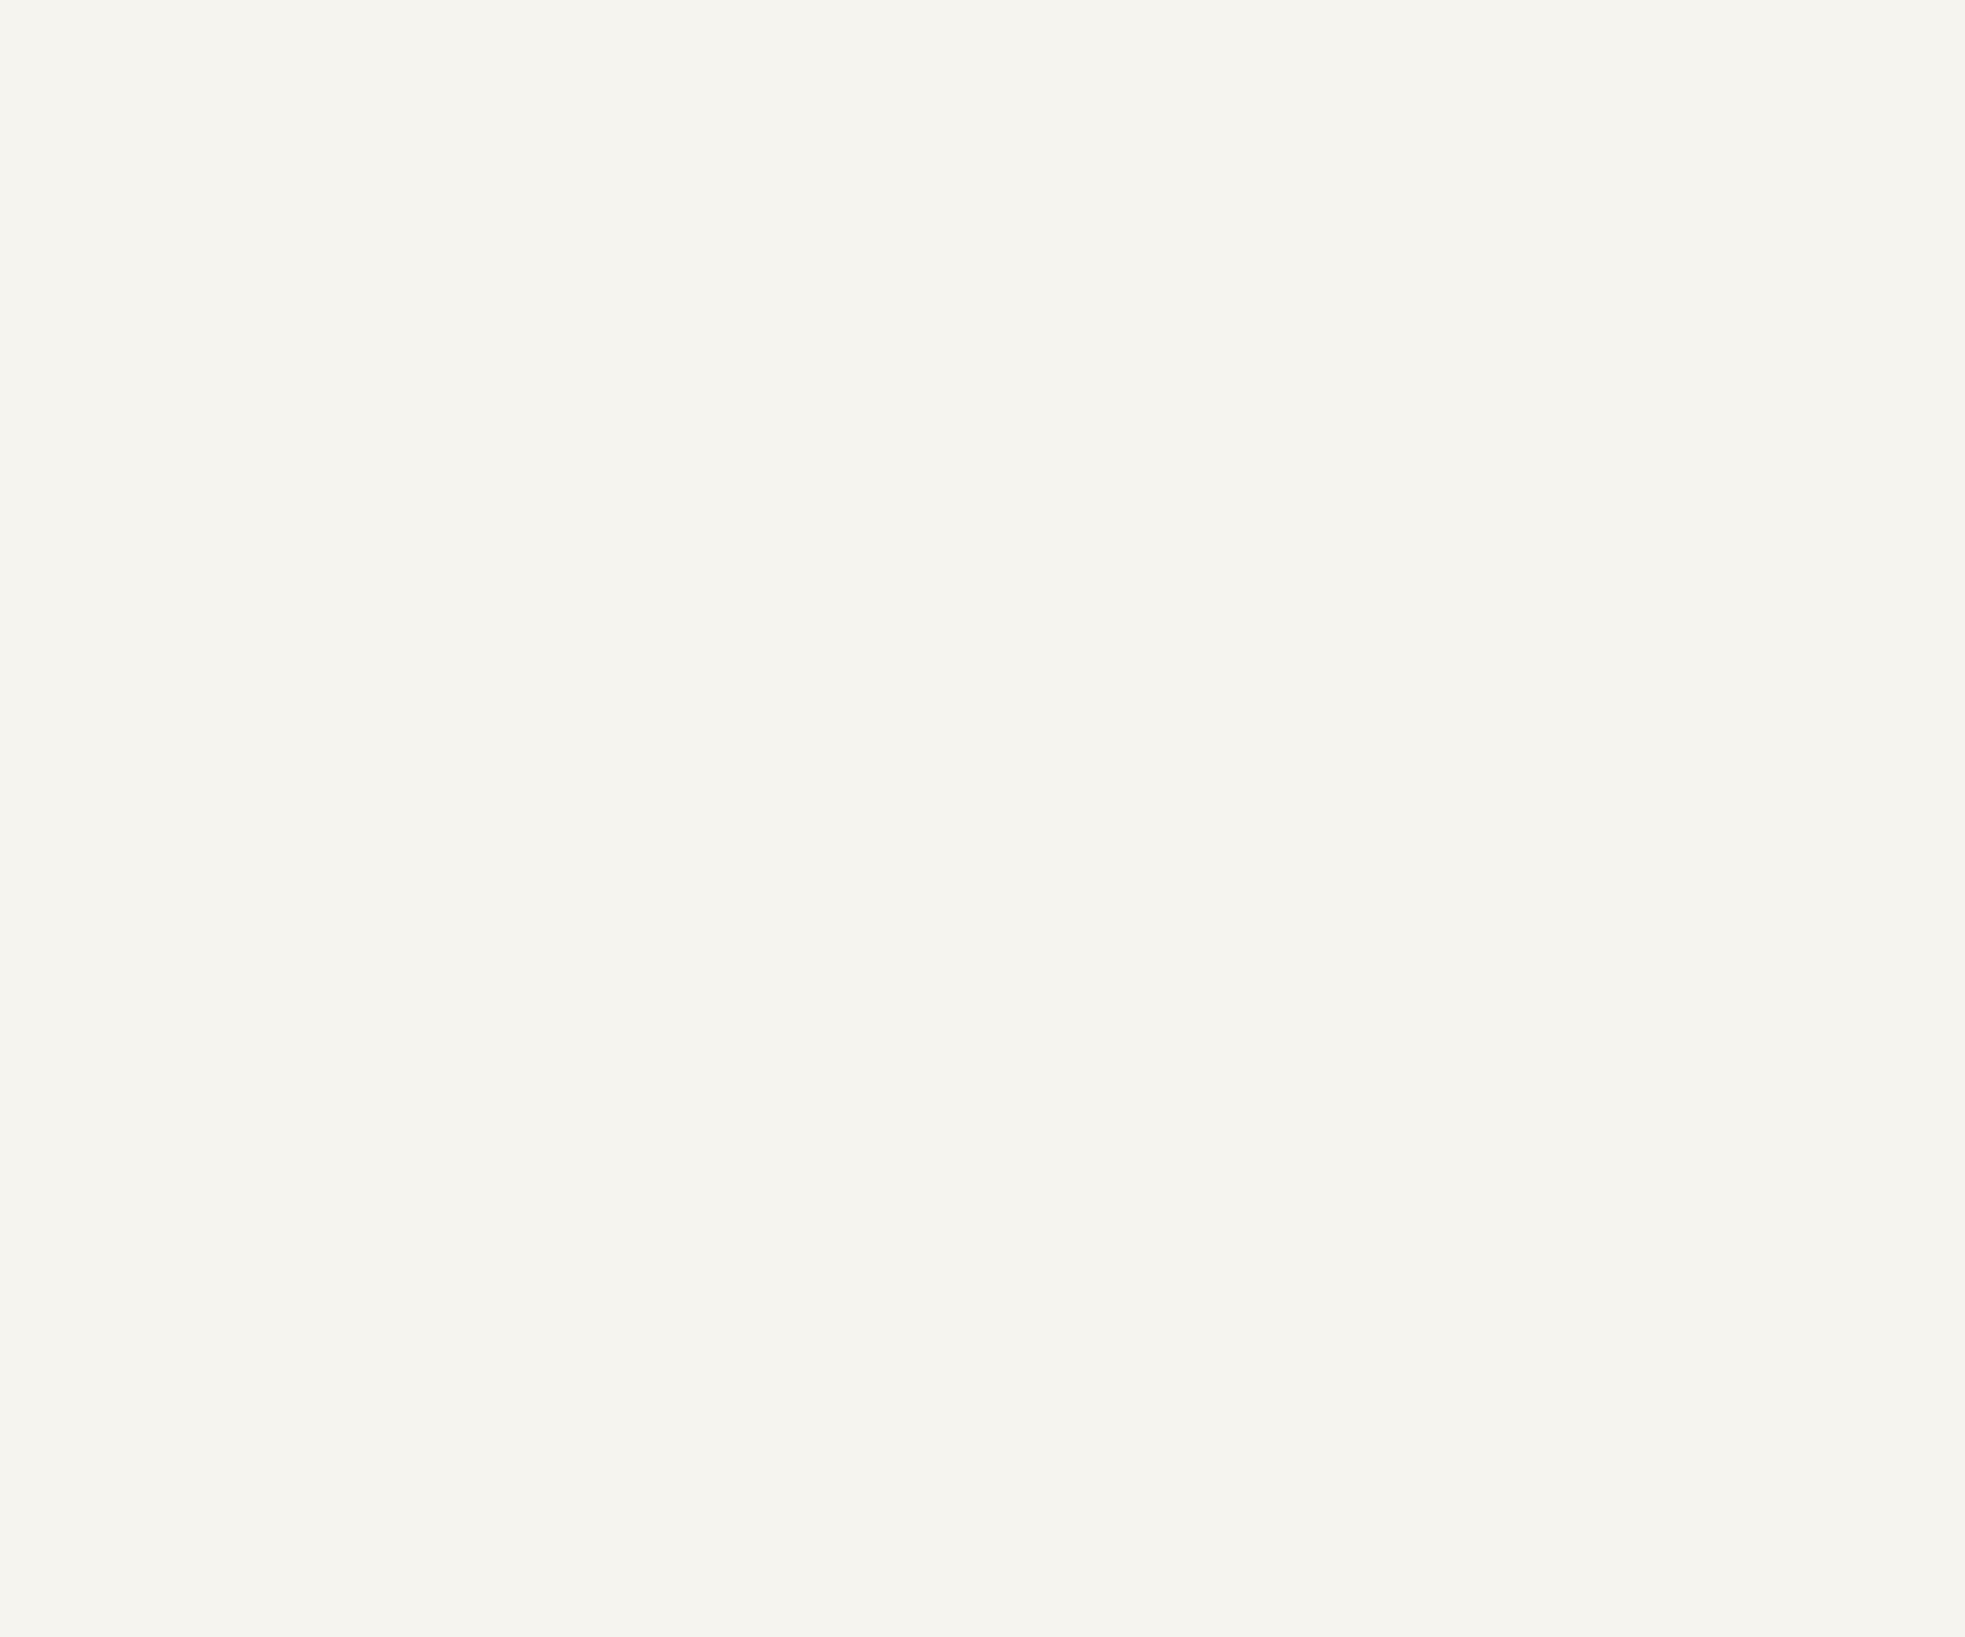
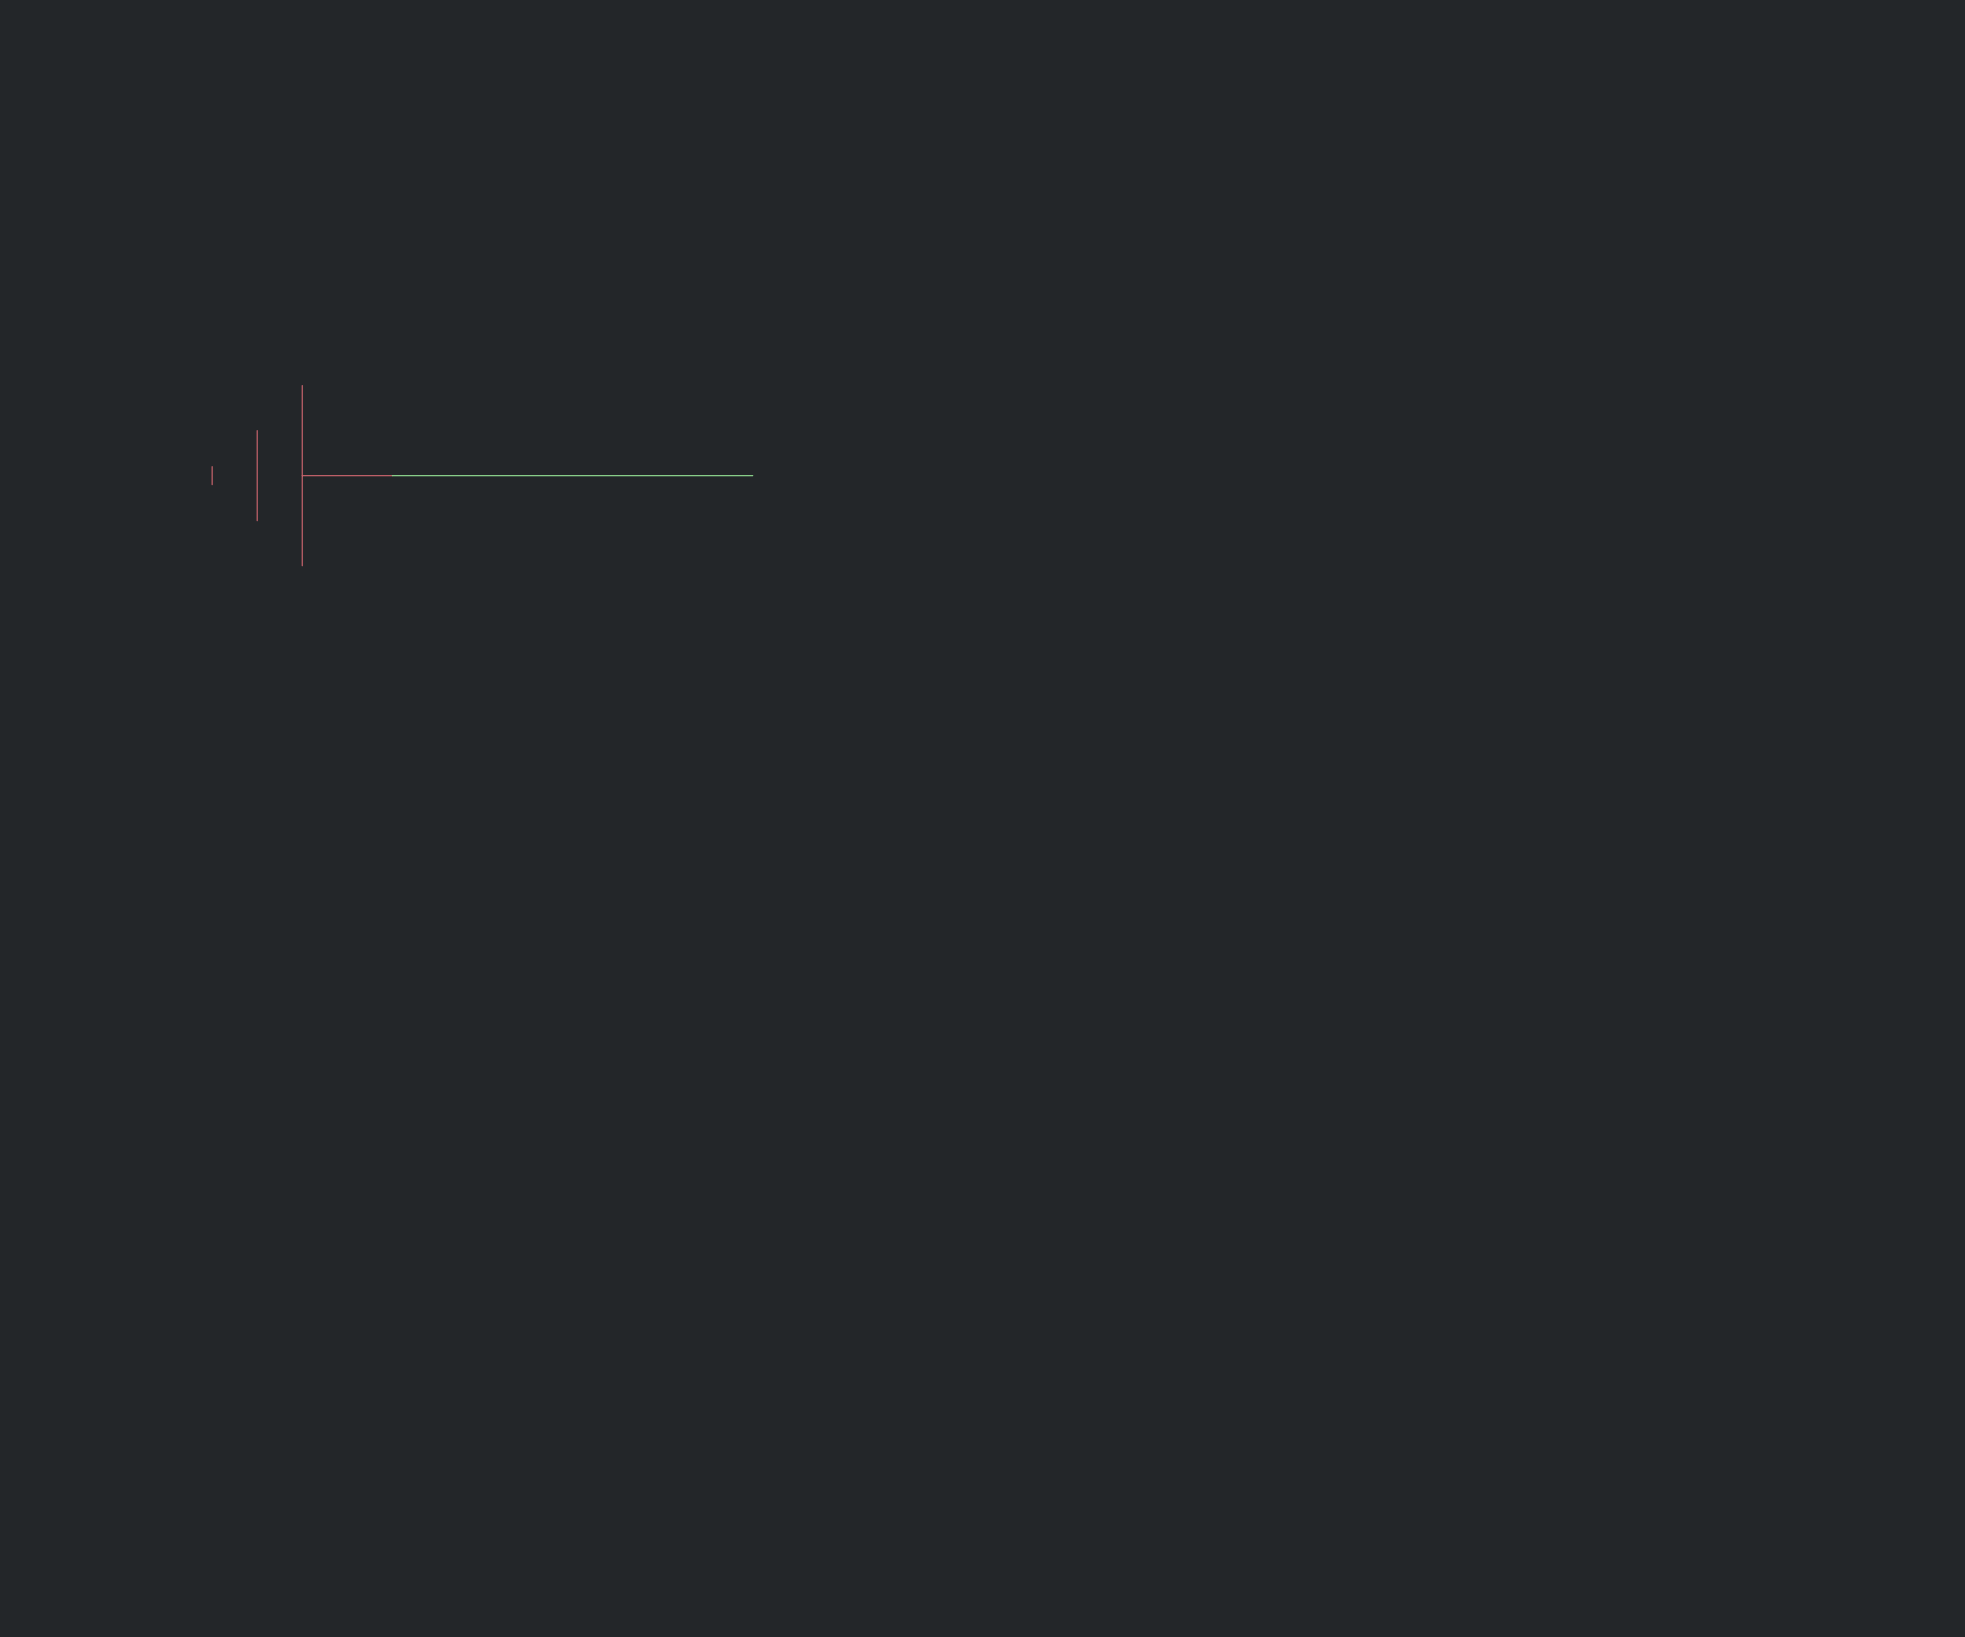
power symbol: none -> (302, 475)
wire: none -> (392, 475) (752, 475)

